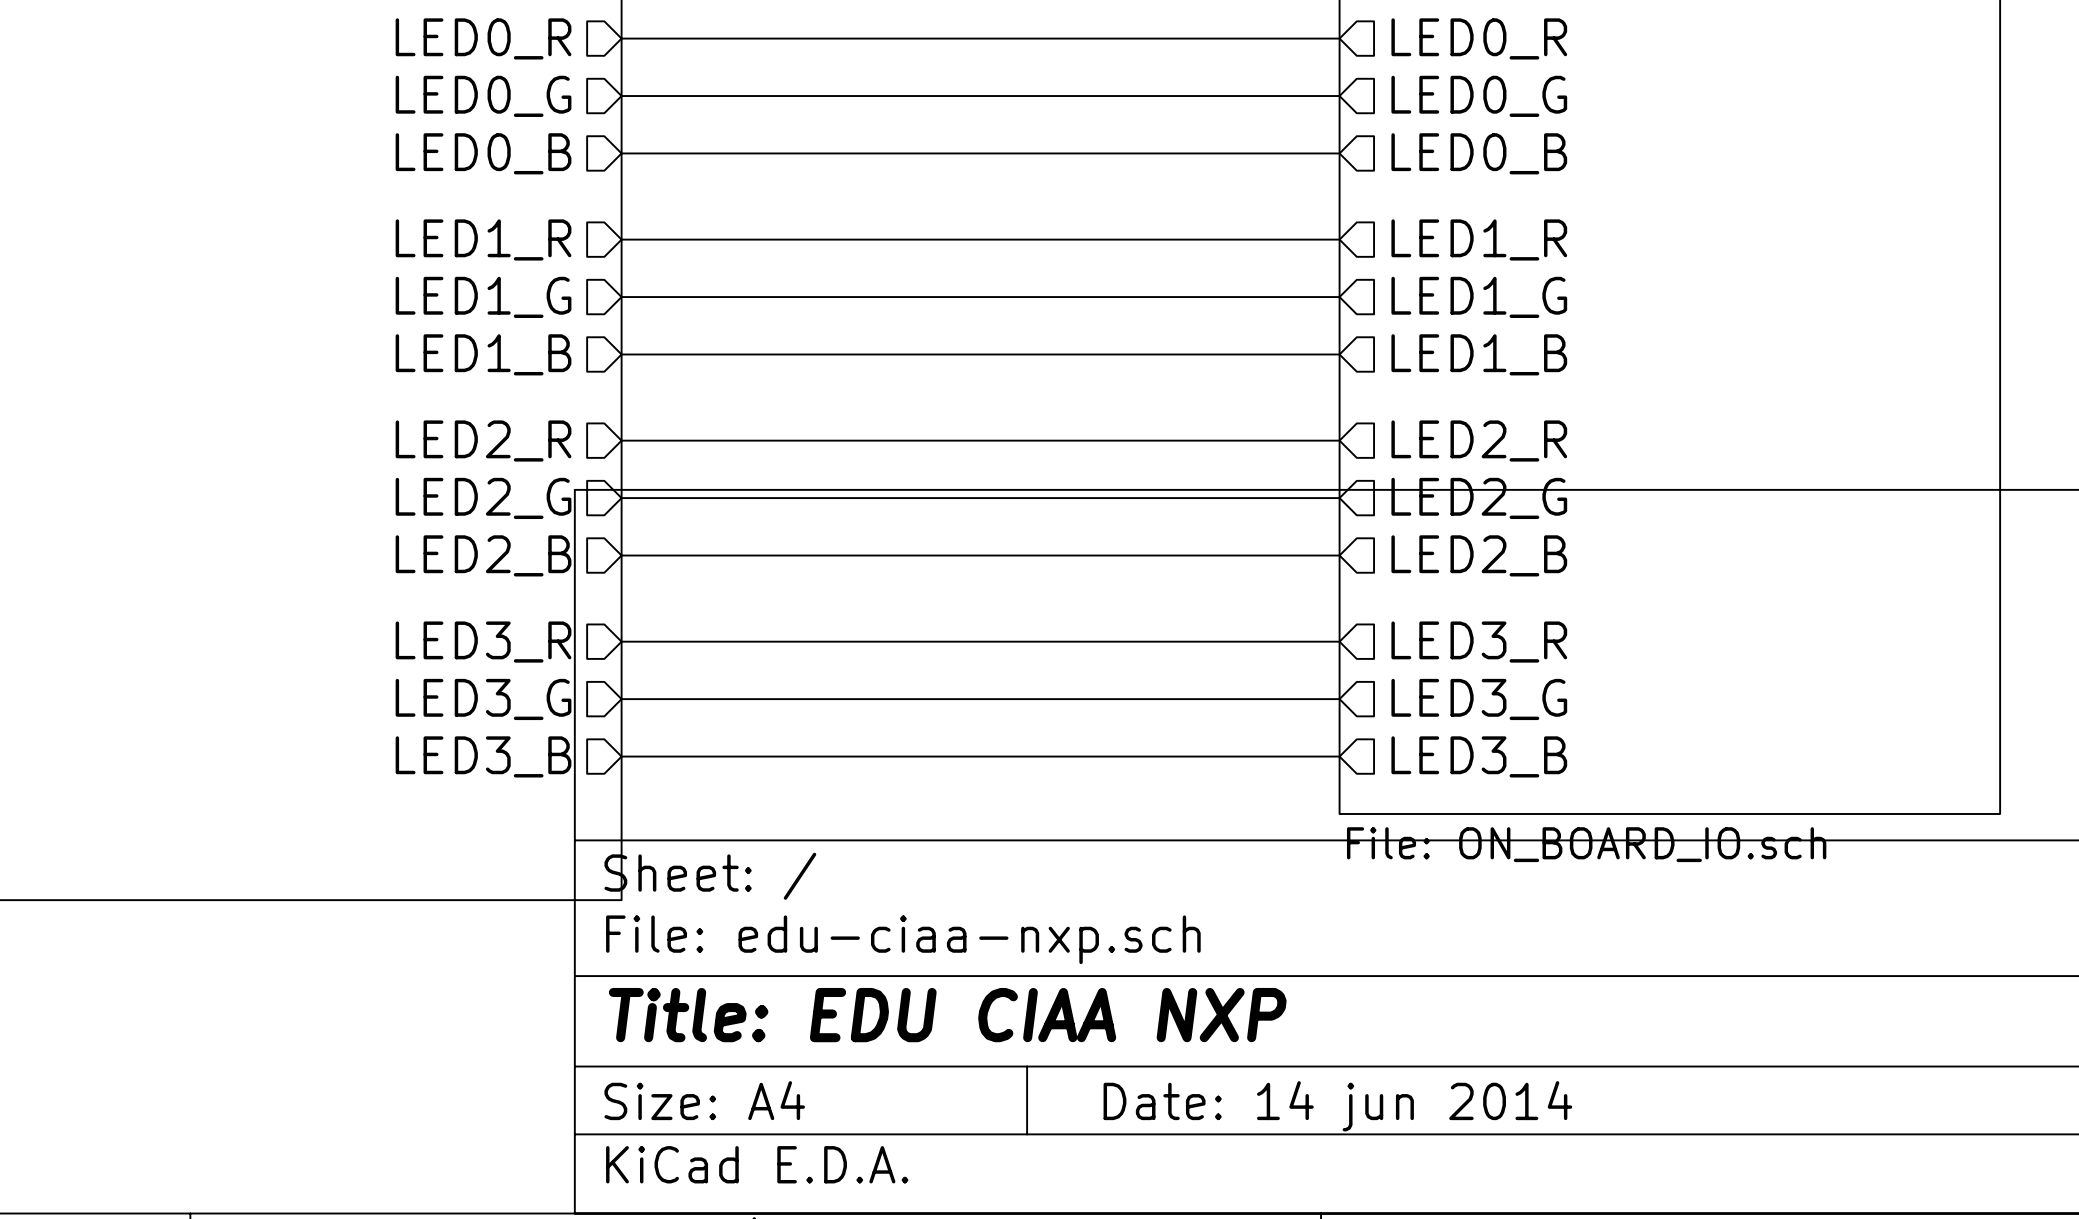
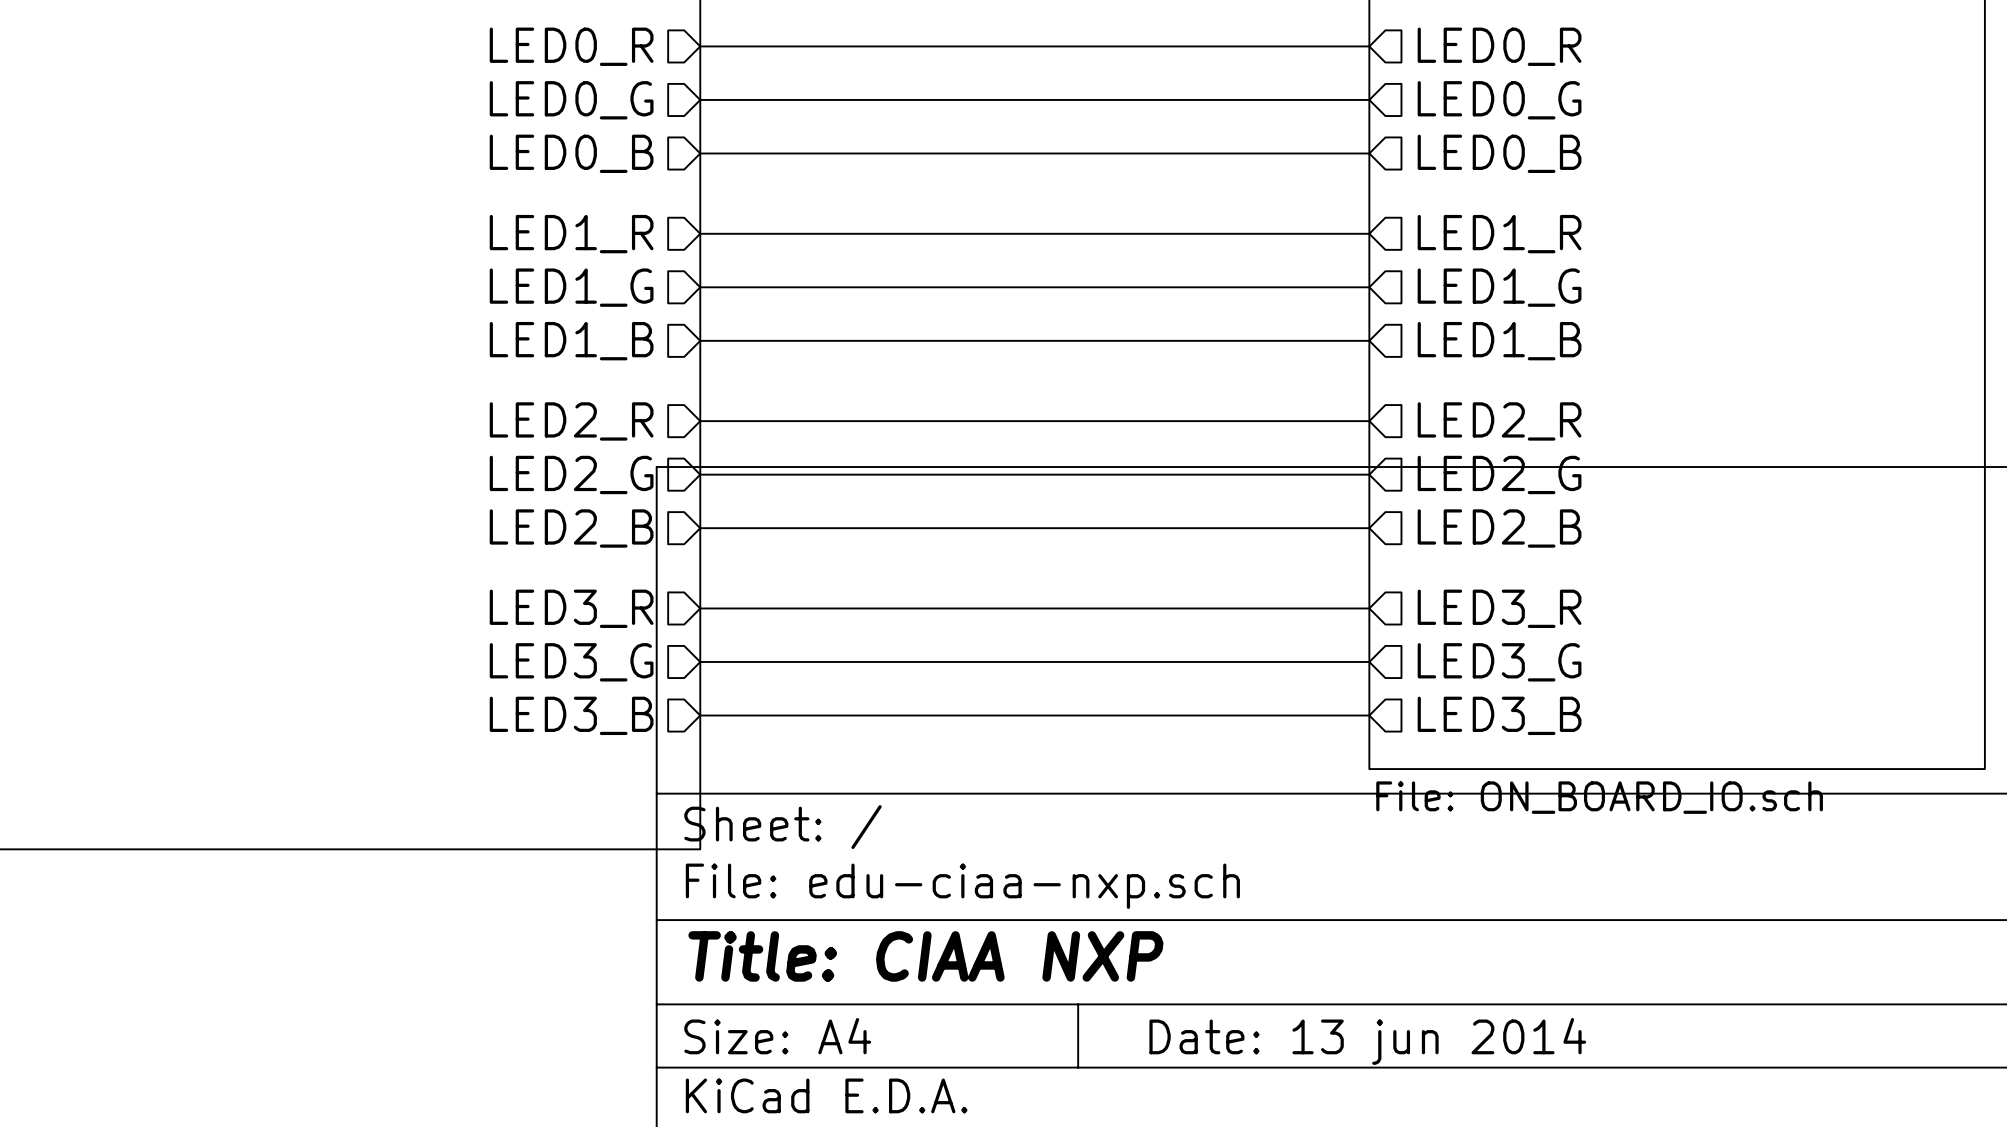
title block: Title: EDU CIAA NXP (947, 1015) -> Title: CIAA NXP (925, 956)
title block: Date: 14 jun 2014 (1337, 1106) -> Date: 13 jun 2014 (1367, 1041)

